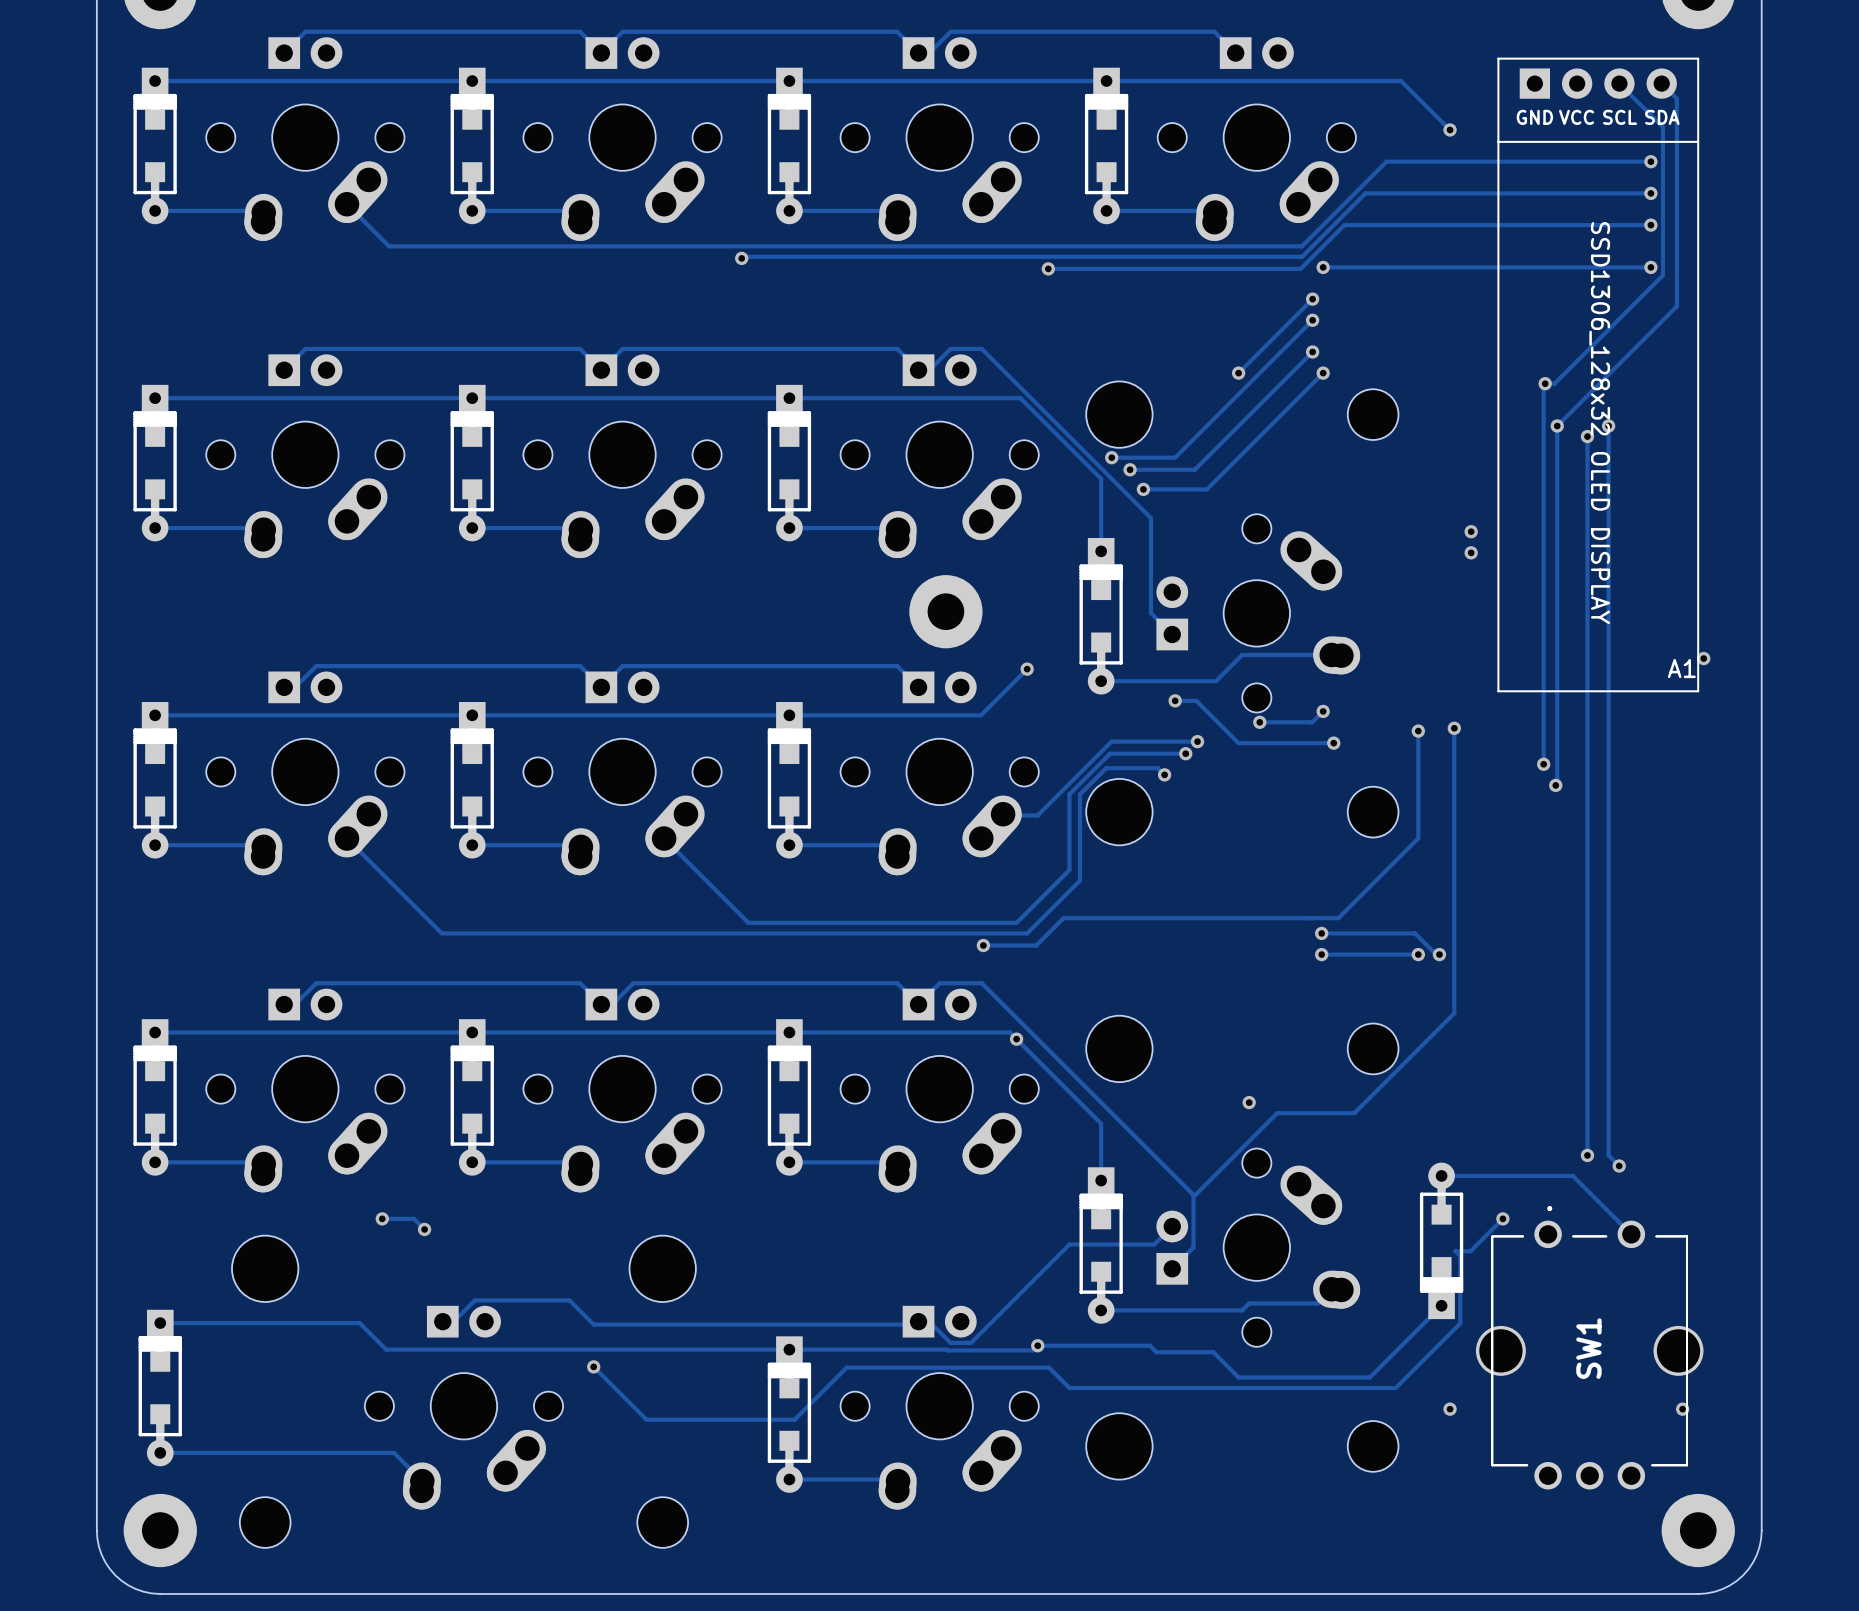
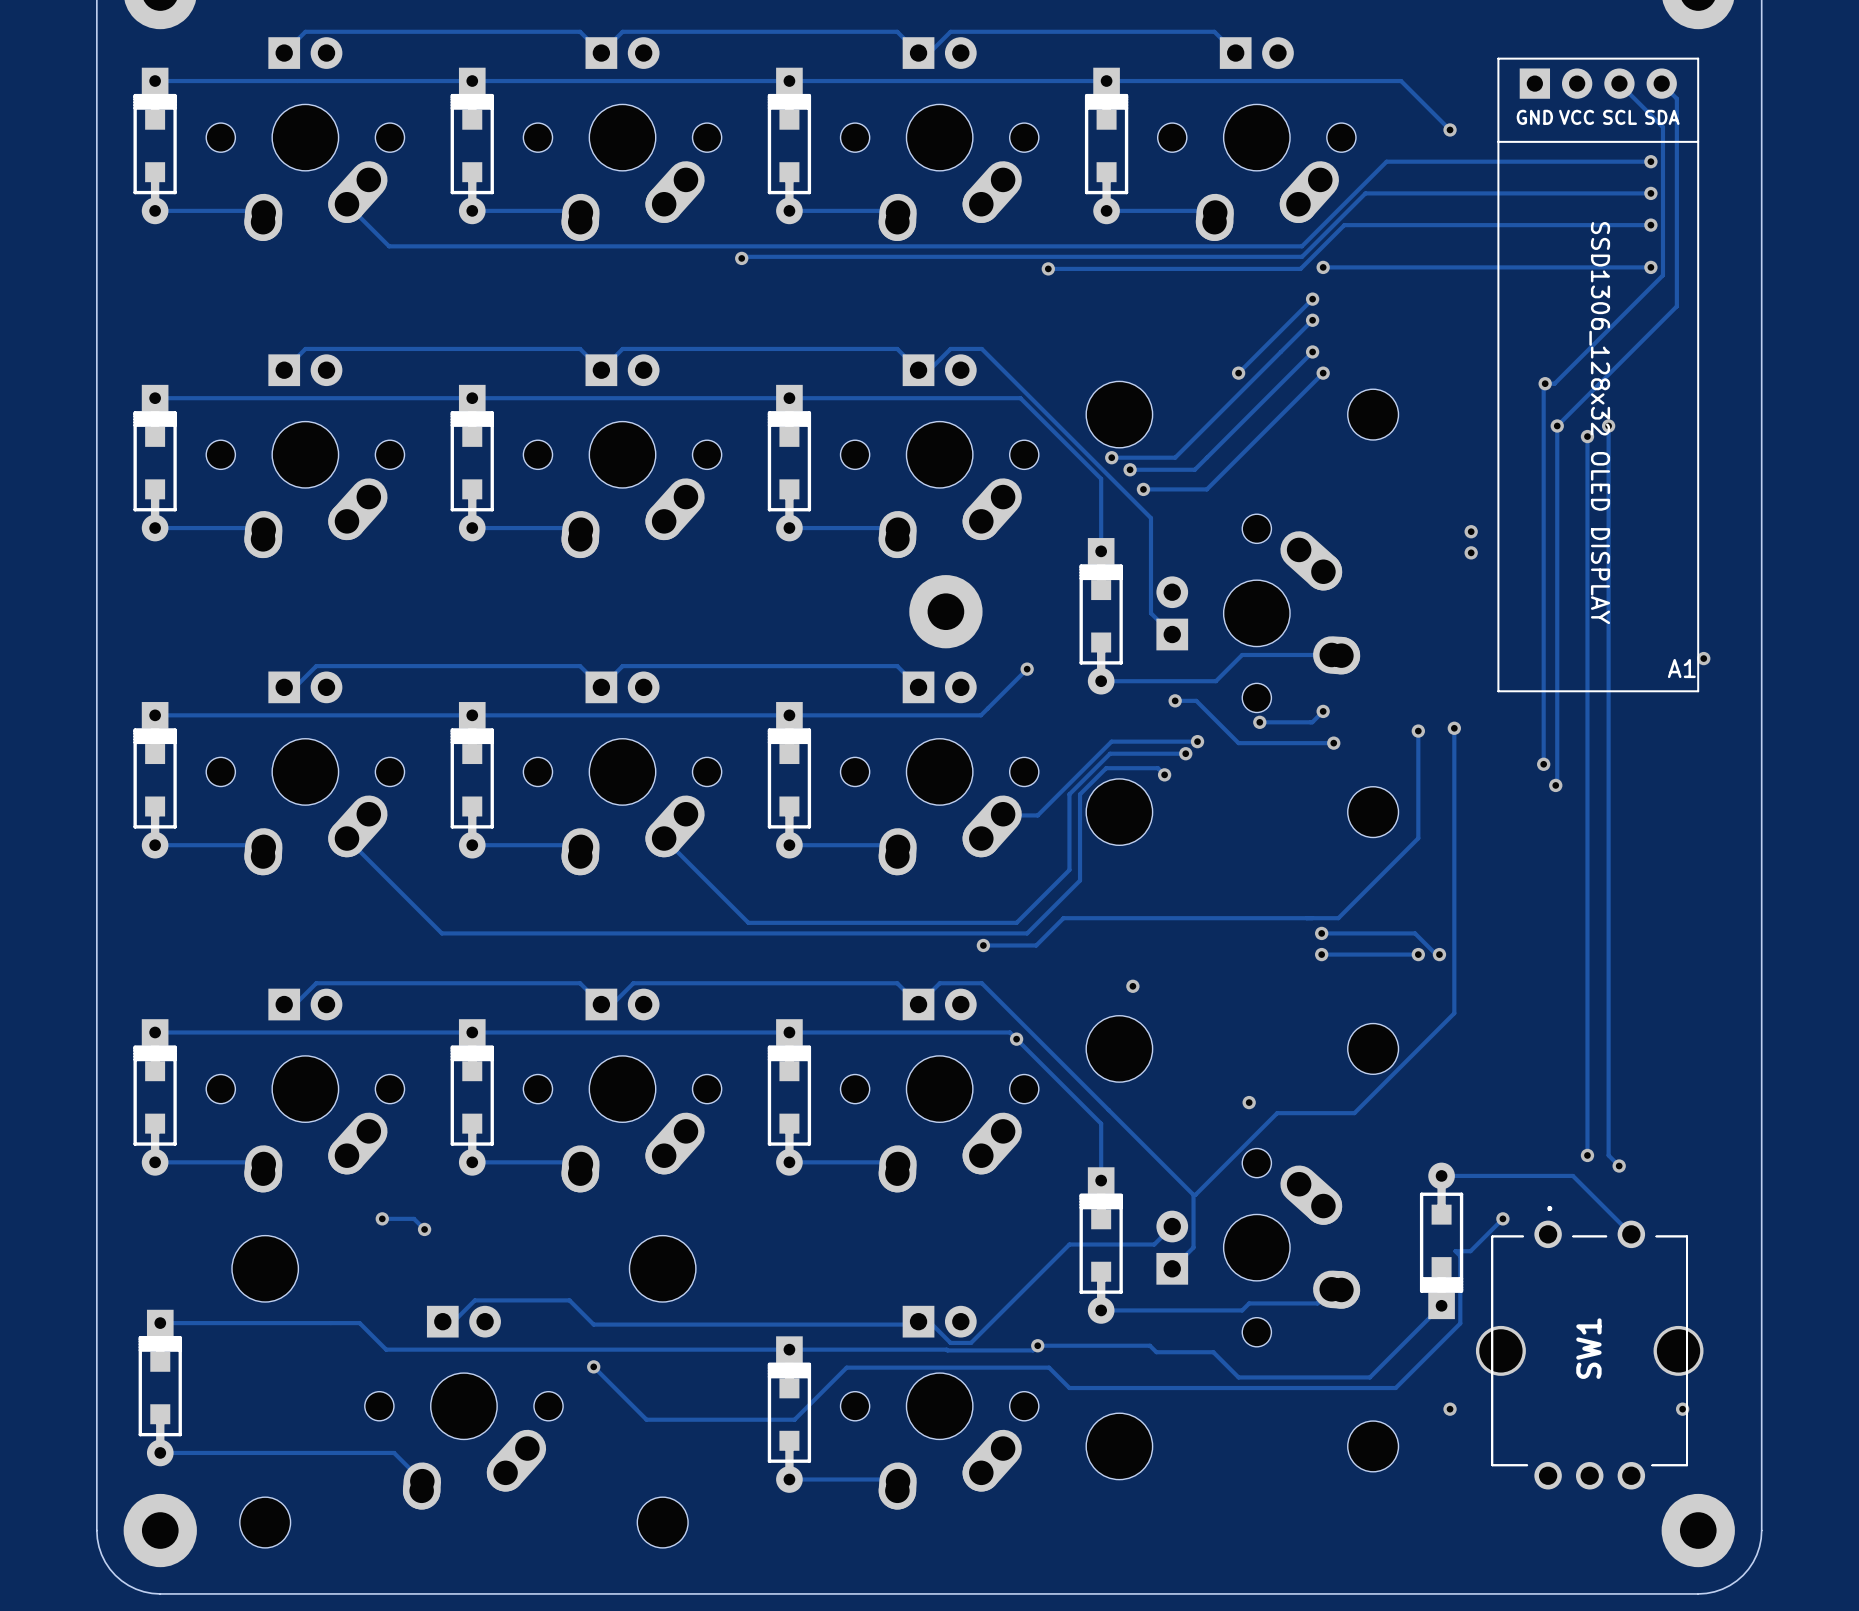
via: none -> (1132, 986)

